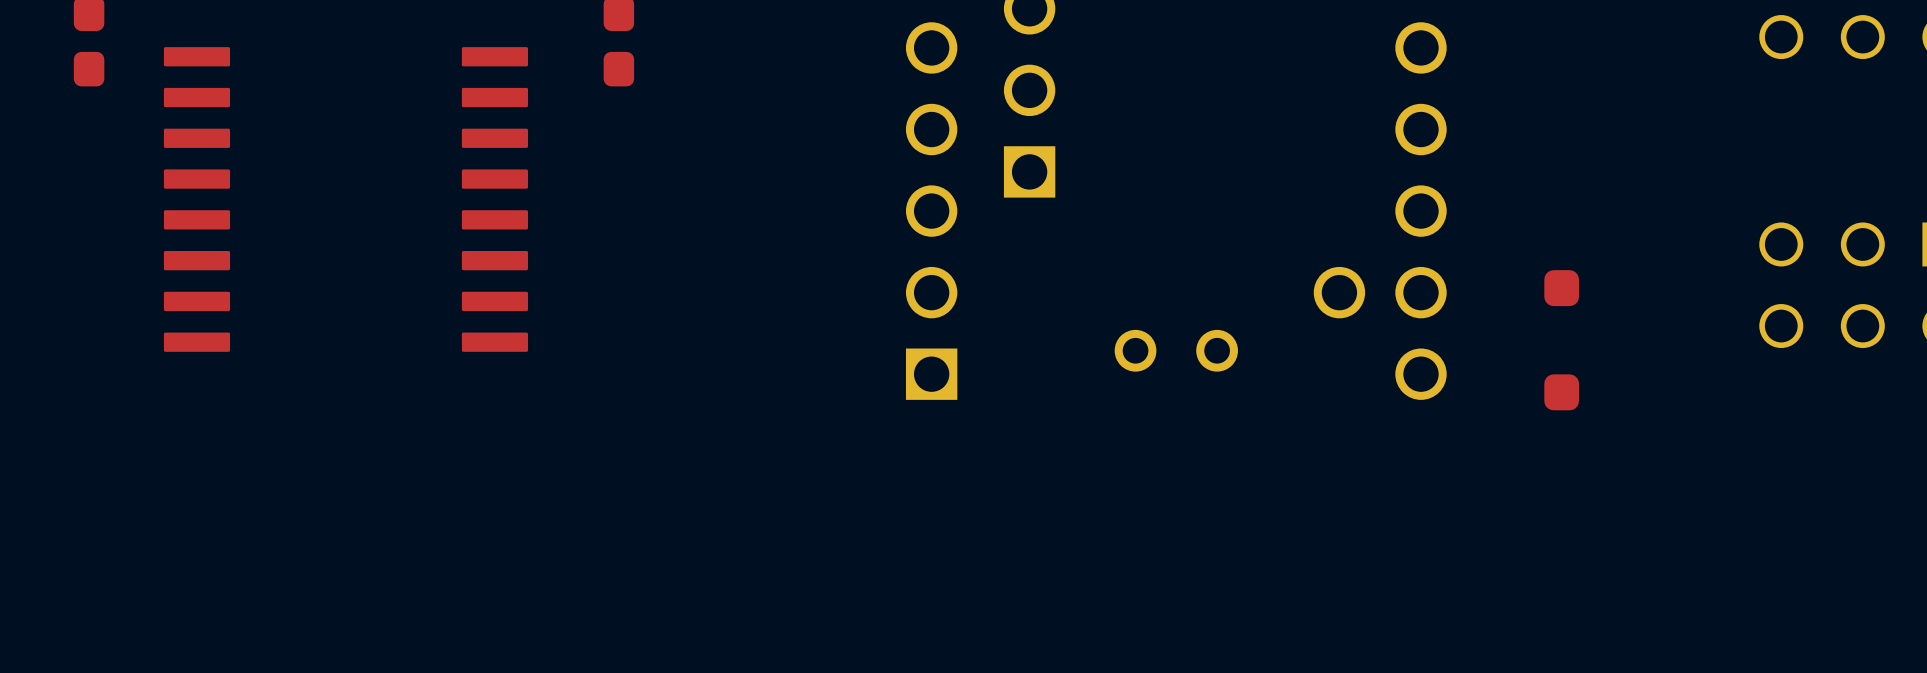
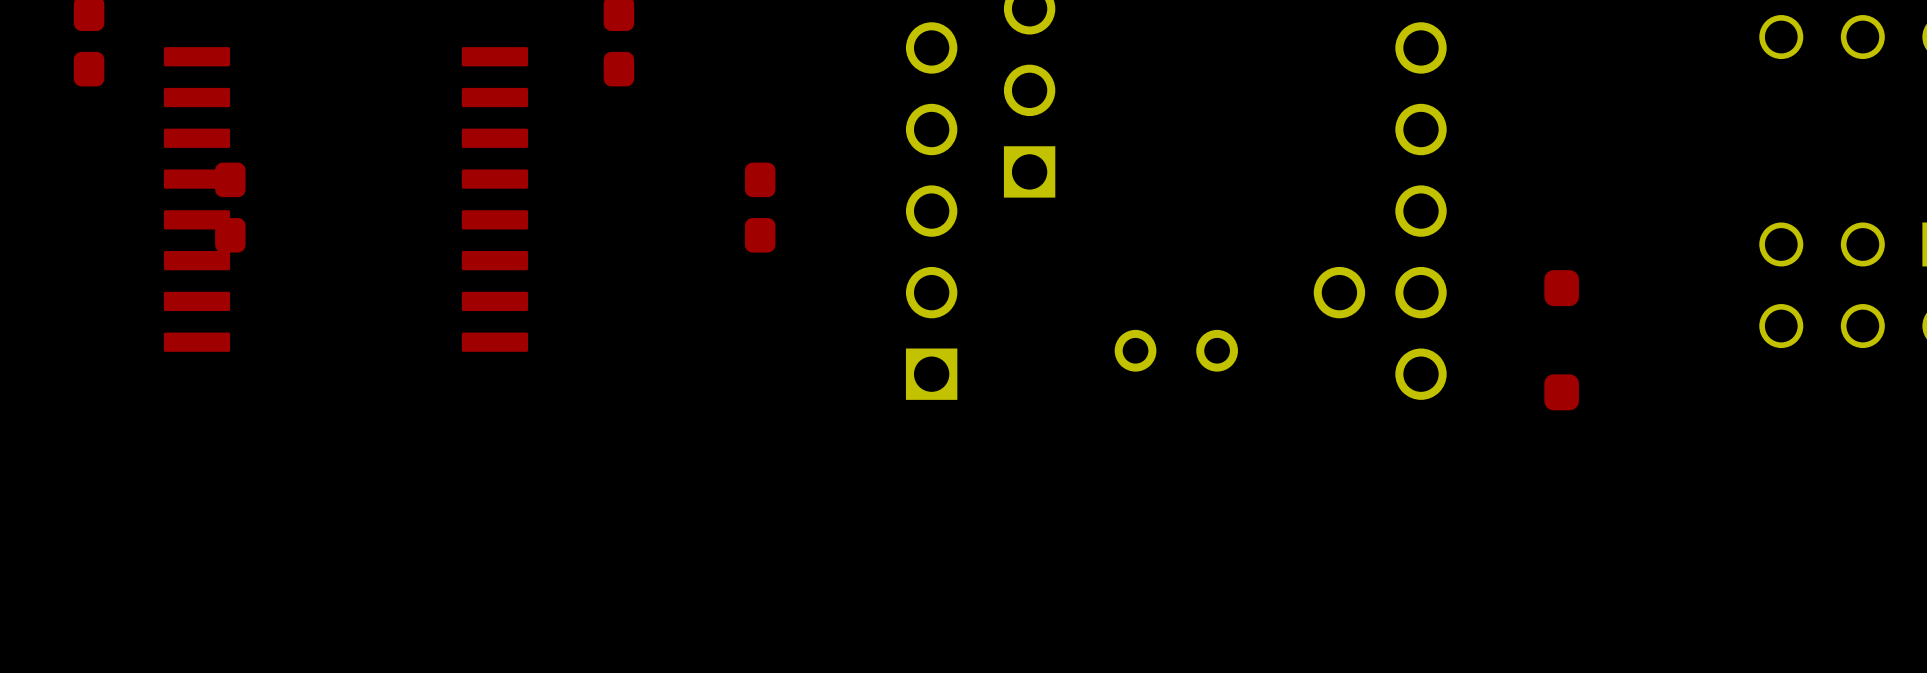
part: none -> (230, 207)
part: none -> (760, 207)

